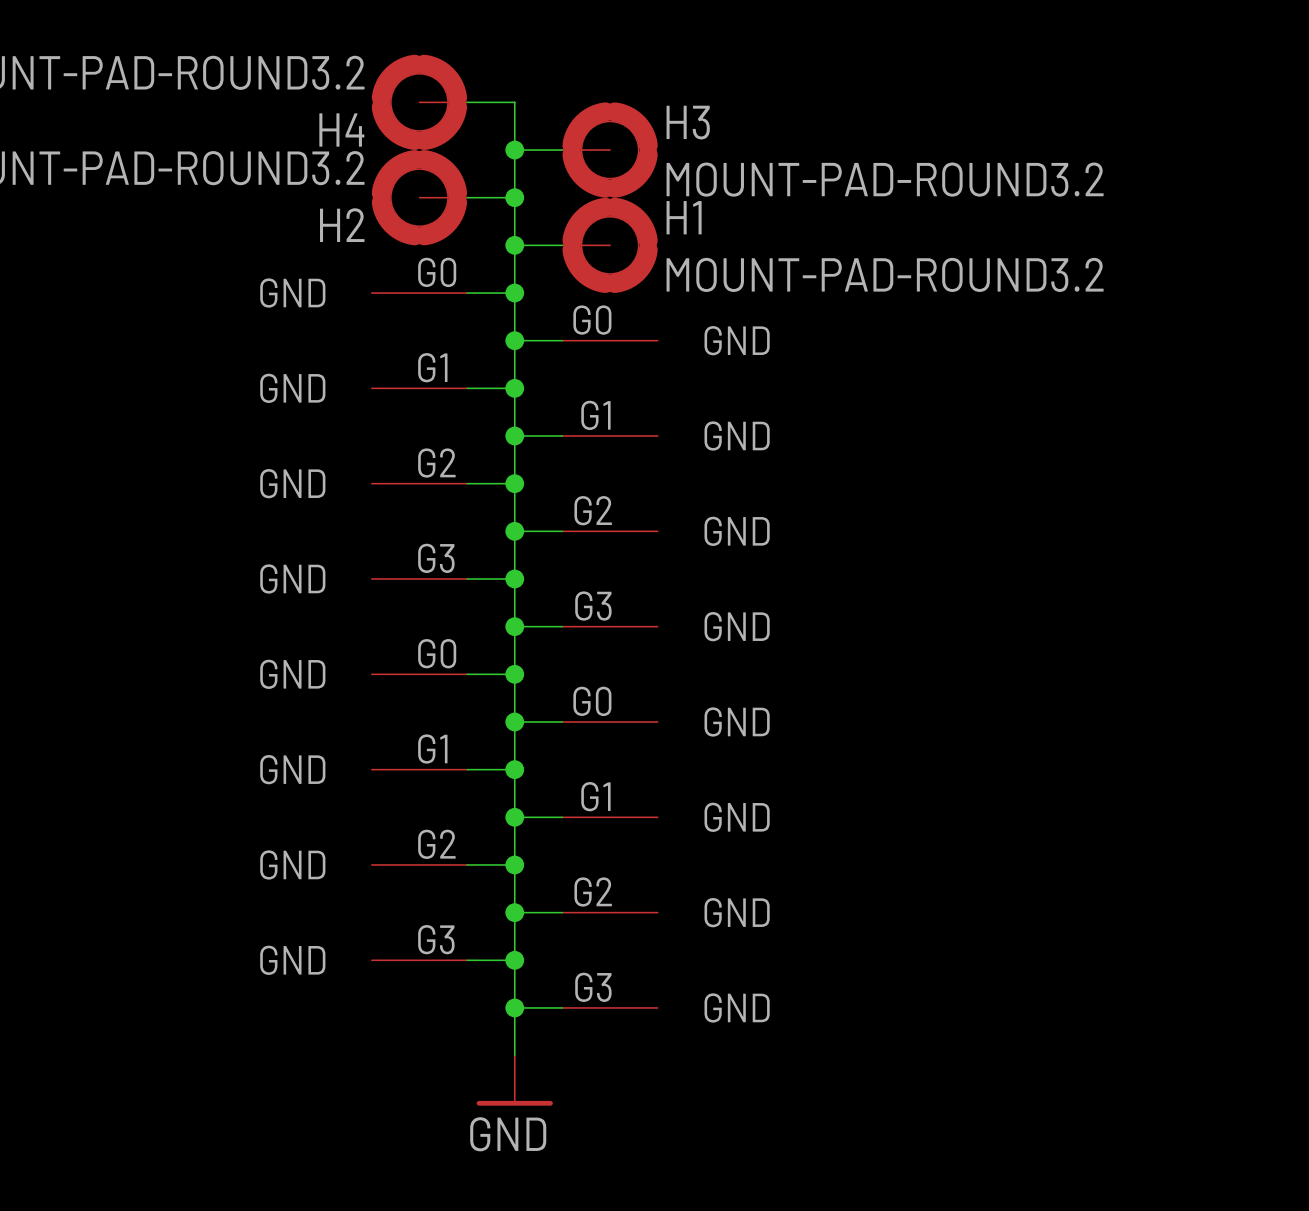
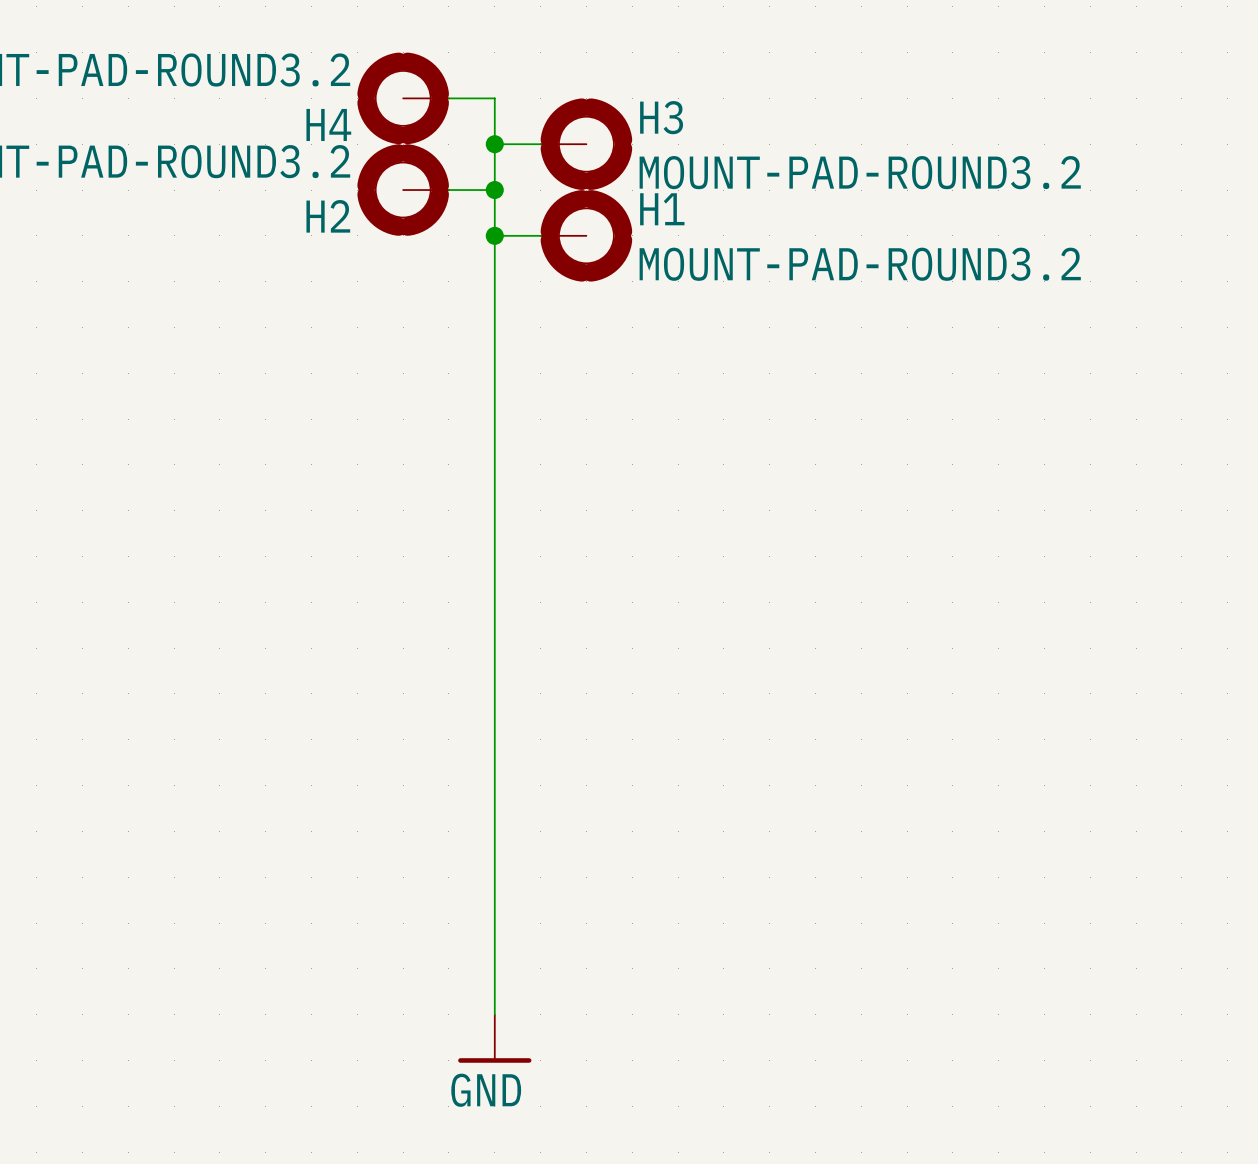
part: (419, 293) -> none
wire: (467, 293) (514, 293) -> none
junction: (514, 293) -> none
wire: (514, 340) (562, 340) -> none
junction: (514, 340) -> none
part: (610, 340) -> none
part: (419, 388) -> none
wire: (467, 388) (514, 388) -> none
junction: (514, 388) -> none
wire: (514, 436) (562, 436) -> none
junction: (514, 436) -> none
part: (610, 436) -> none
part: (419, 483) -> none
wire: (467, 483) (514, 483) -> none
junction: (514, 483) -> none
wire: (514, 531) (562, 531) -> none
junction: (514, 531) -> none
part: (610, 531) -> none
part: (419, 579) -> none
wire: (467, 579) (514, 579) -> none
junction: (514, 579) -> none
wire: (514, 626) (562, 626) -> none
junction: (514, 626) -> none
part: (610, 626) -> none
part: (419, 674) -> none
wire: (467, 674) (514, 674) -> none
junction: (514, 674) -> none
wire: (514, 721) (562, 721) -> none
junction: (514, 721) -> none
part: (610, 721) -> none
part: (419, 769) -> none
wire: (467, 769) (514, 769) -> none
junction: (514, 769) -> none
wire: (514, 817) (562, 817) -> none
junction: (514, 817) -> none
part: (610, 817) -> none
part: (419, 864) -> none
wire: (467, 864) (514, 864) -> none
junction: (514, 864) -> none
wire: (514, 912) (562, 912) -> none
junction: (514, 912) -> none
part: (610, 912) -> none
part: (419, 960) -> none
wire: (467, 960) (514, 960) -> none
junction: (514, 960) -> none
wire: (514, 1007) (562, 1007) -> none
junction: (514, 1007) -> none
part: (610, 1007) -> none

